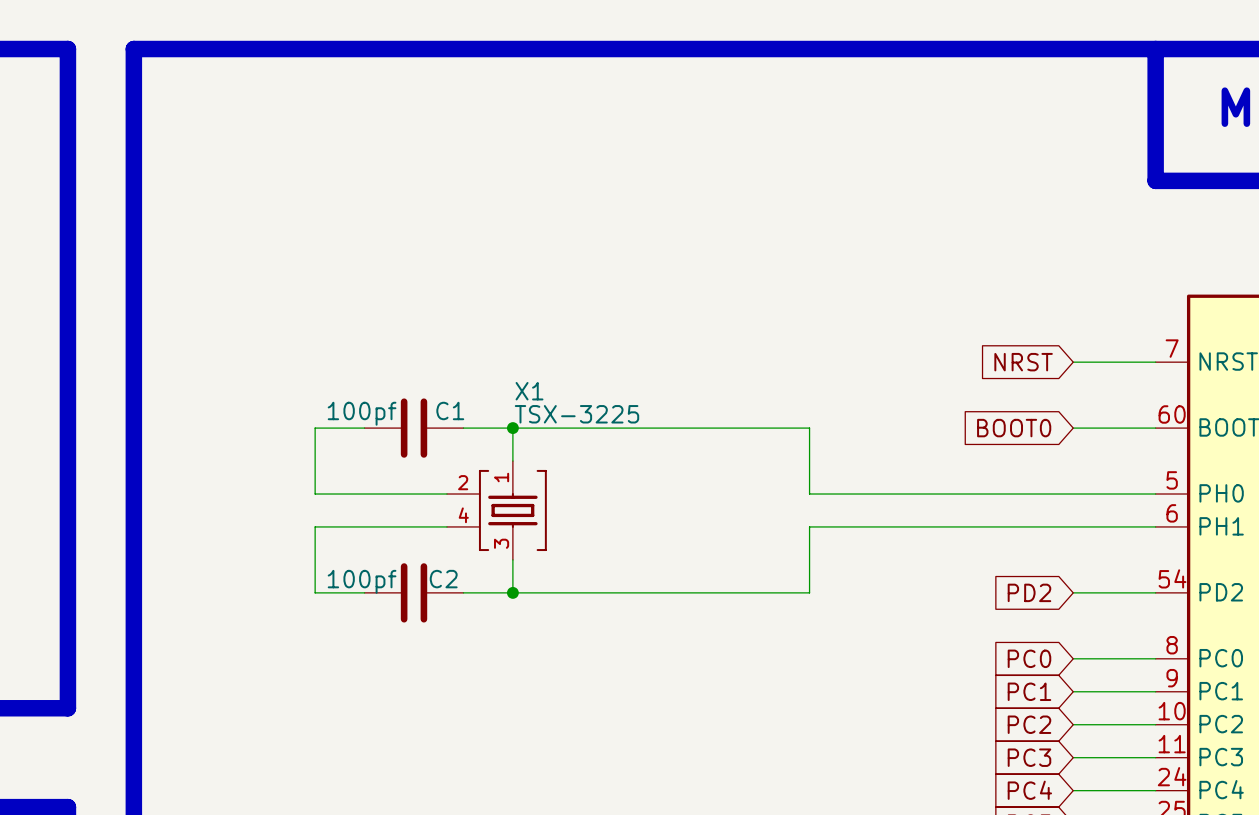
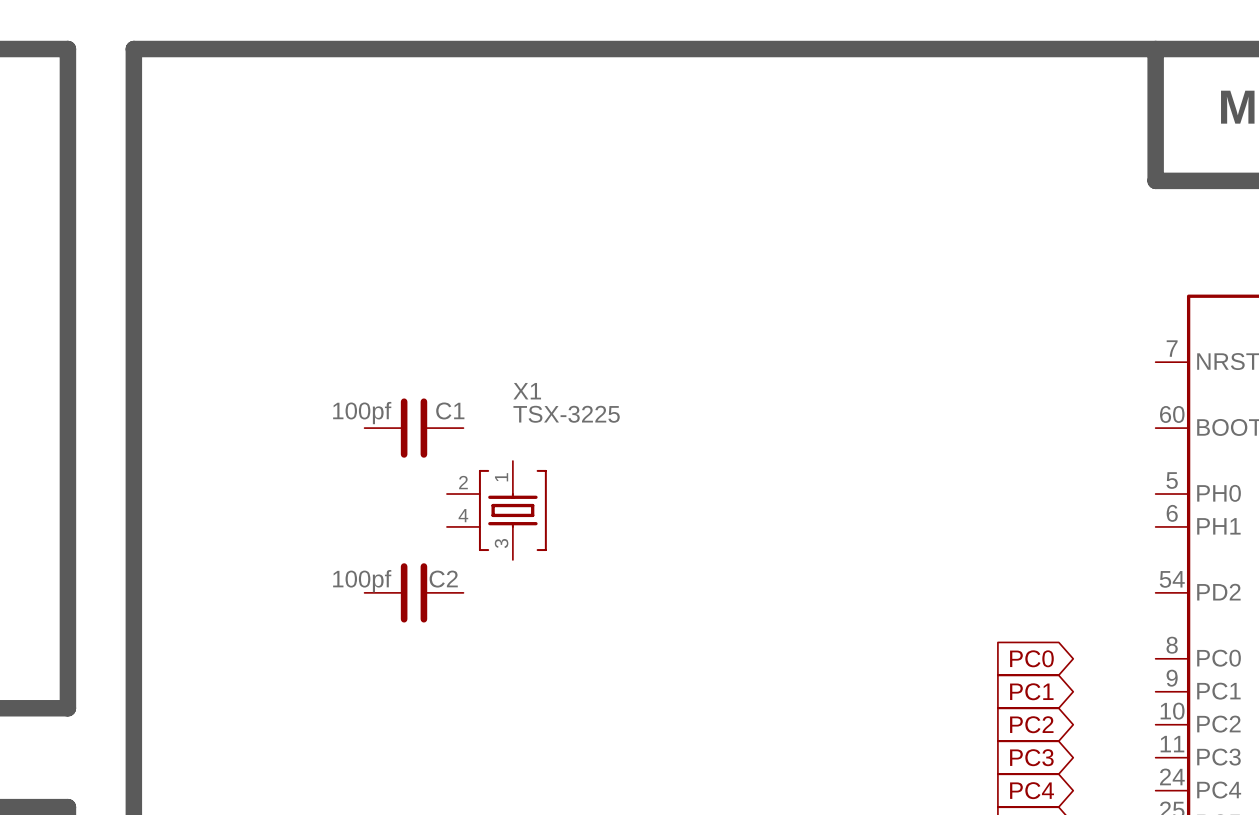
global label: NRST (1023, 362) -> none
wire: (1073, 362) (1155, 362) -> none
wire: (364, 428) (315, 428) (315, 494) (446, 494) -> none
wire: (463, 428) (809, 428) (809, 494) (1155, 494) -> none
wire: (512, 428) (512, 461) -> none
junction: (512, 428) -> none
global label: BOOT0 (1014, 428) -> none
wire: (1073, 428) (1155, 428) -> none
wire: (446, 526) (315, 526) (315, 592) (364, 592) -> none
wire: (1155, 526) (809, 526) (809, 592) (463, 592) -> none
wire: (512, 559) (512, 592) -> none
junction: (512, 592) -> none
global label: PD2 (1029, 592) -> none
wire: (1073, 592) (1155, 592) -> none
wire: (1073, 658) (1155, 658) -> none
wire: (1073, 691) (1155, 691) -> none
wire: (1073, 724) (1155, 724) -> none
wire: (1073, 757) (1155, 757) -> none
wire: (1073, 790) (1155, 790) -> none

